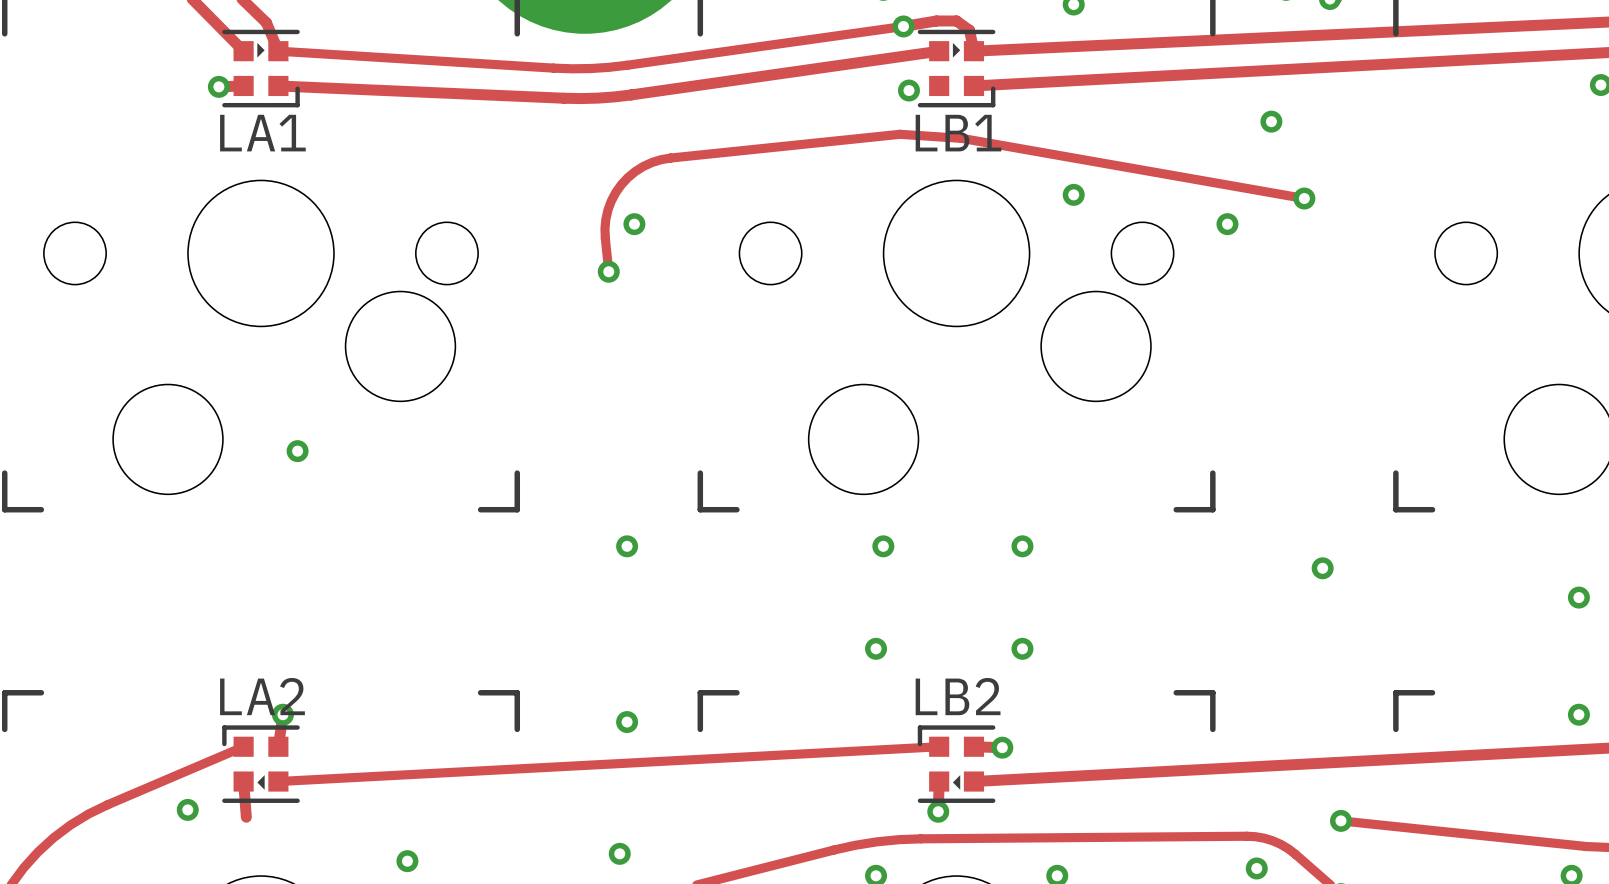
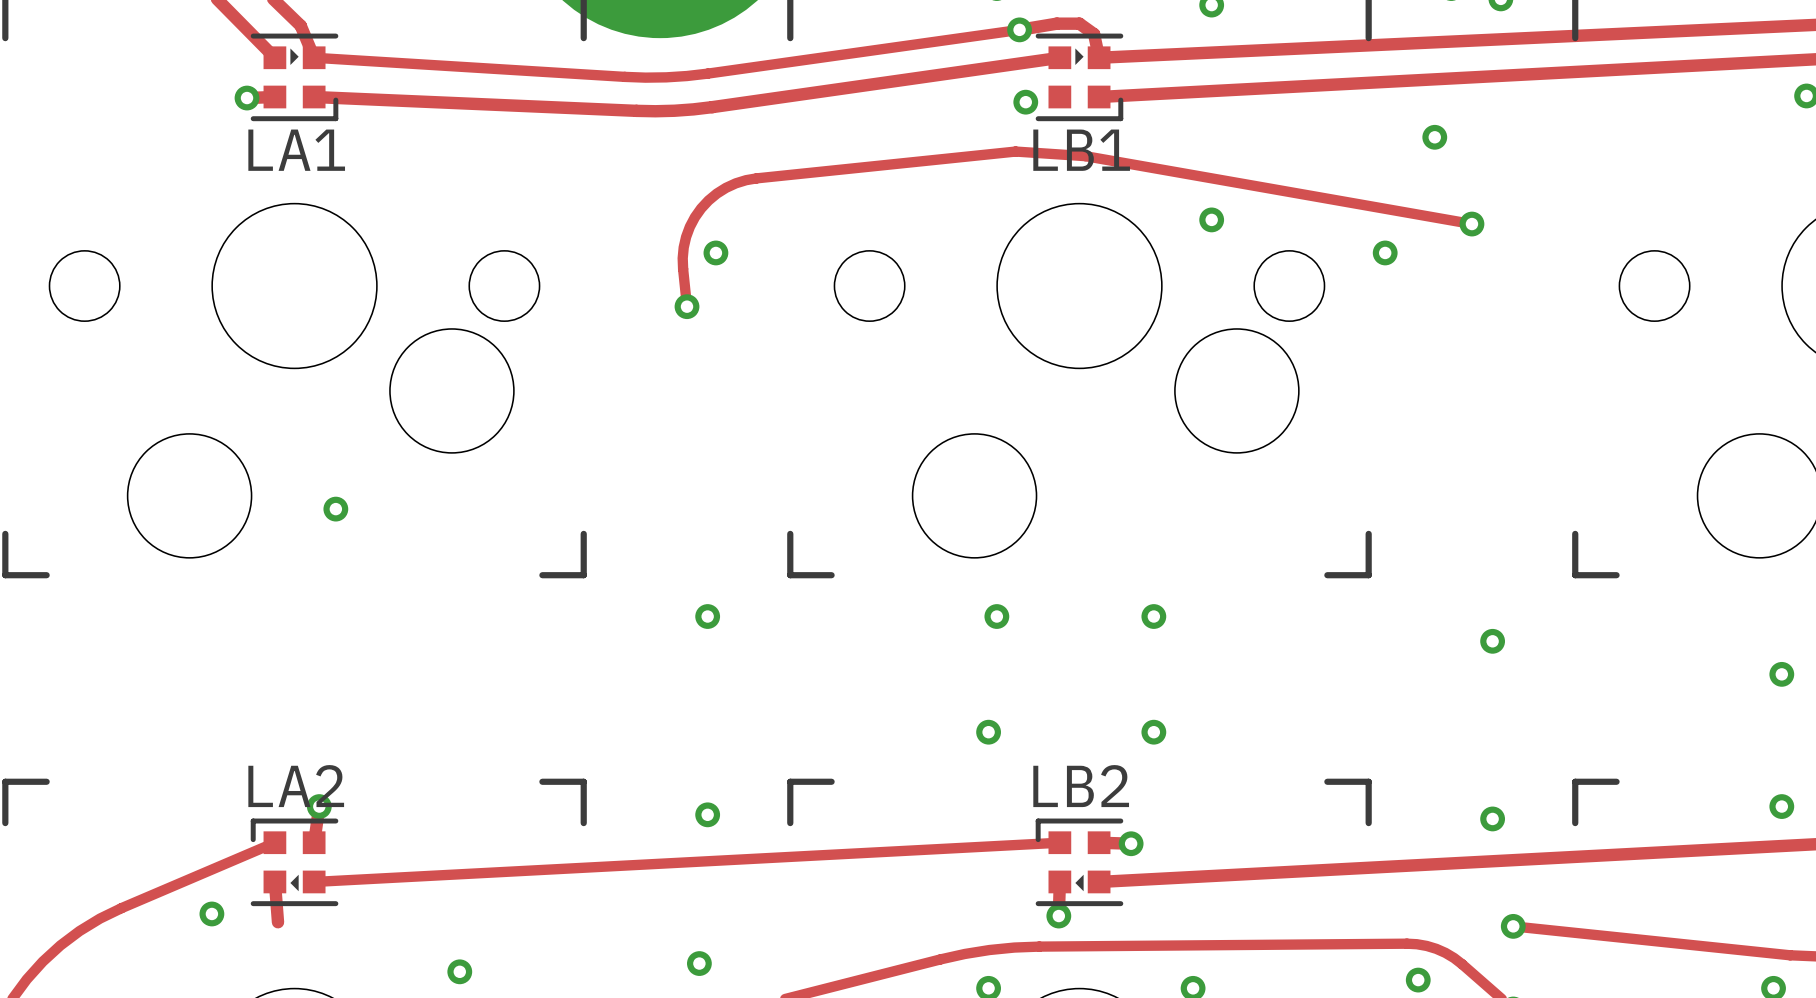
via: none -> (1492, 818)

